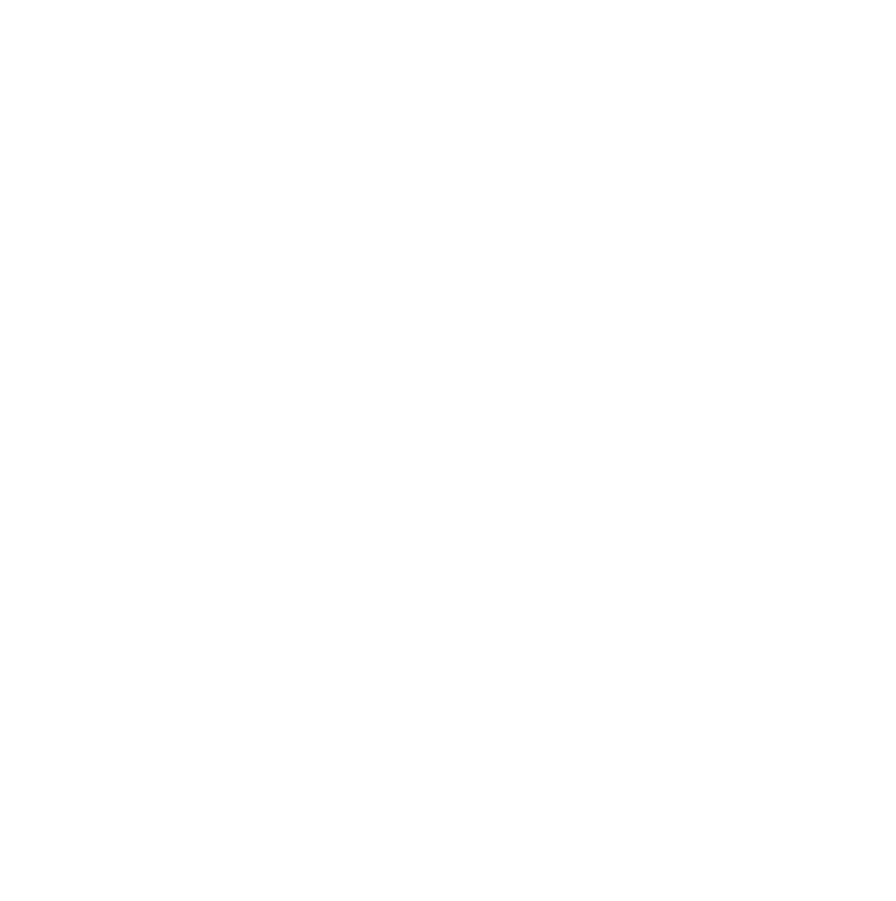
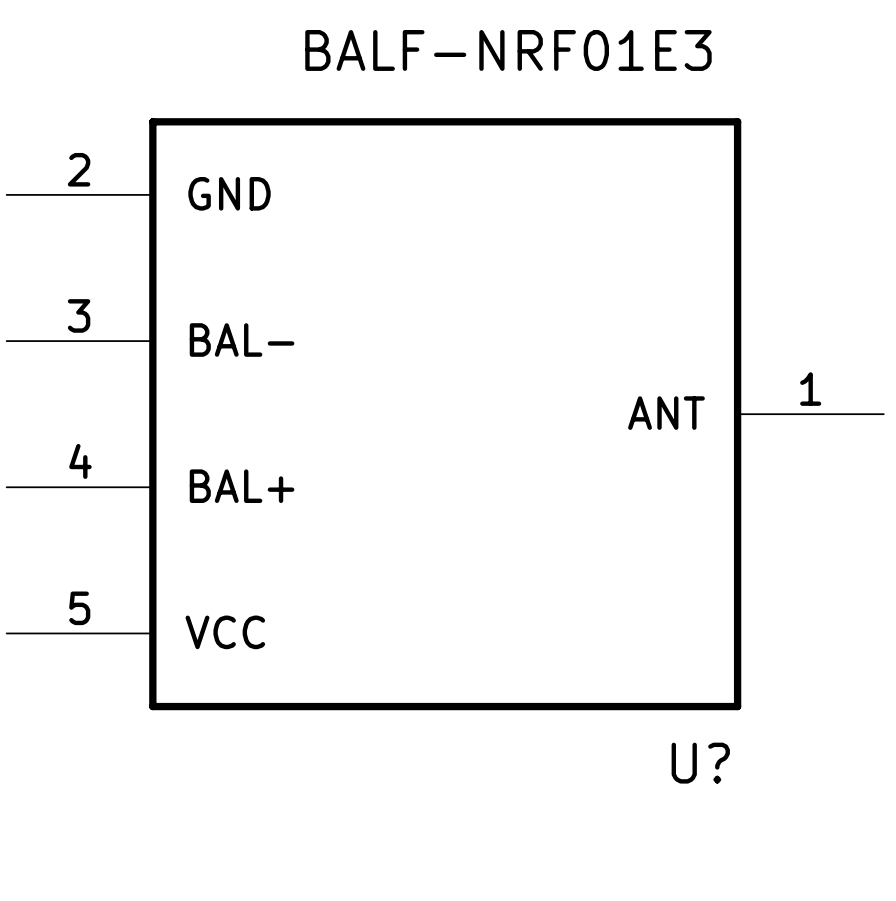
U?: none -> BALF-NRF01E3 (445, 414)

